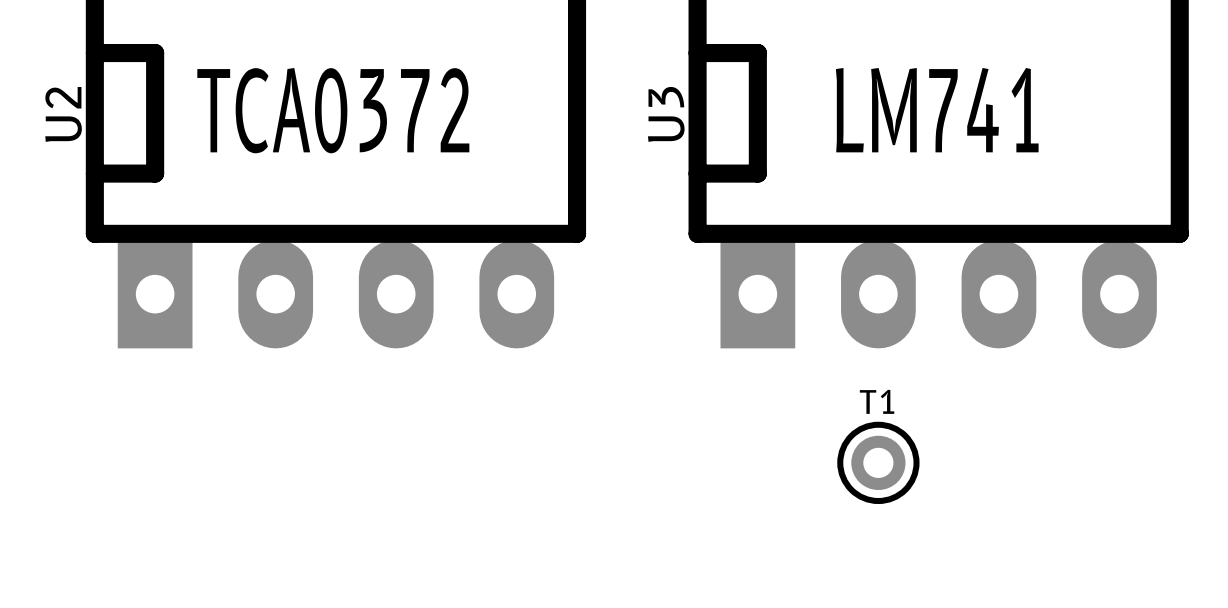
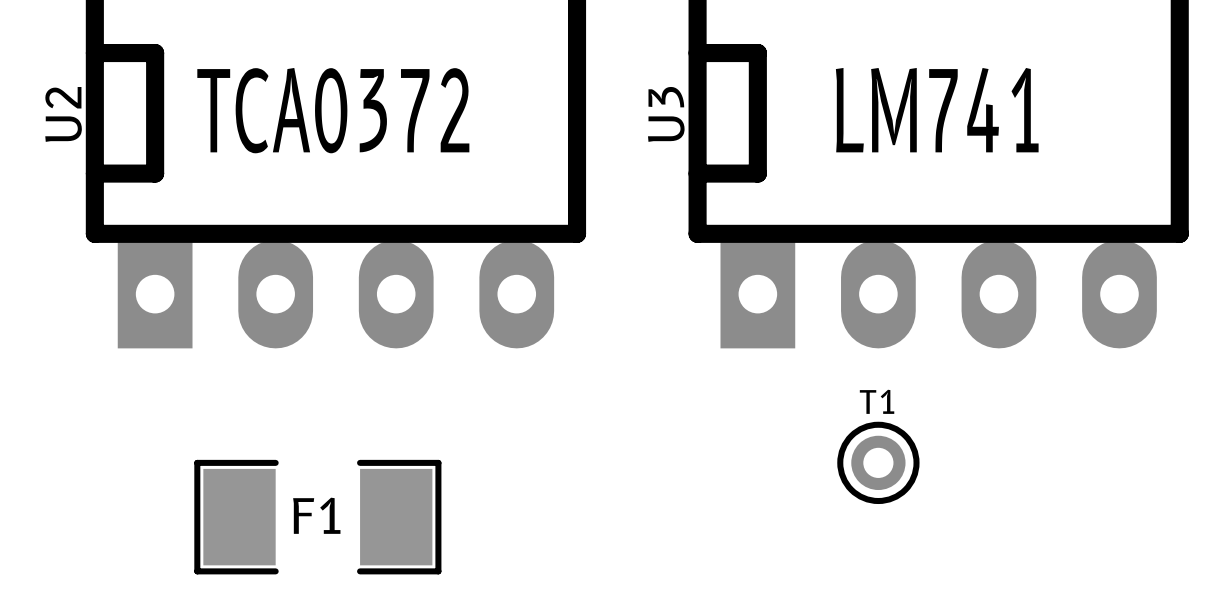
F1: none -> (317, 517)

